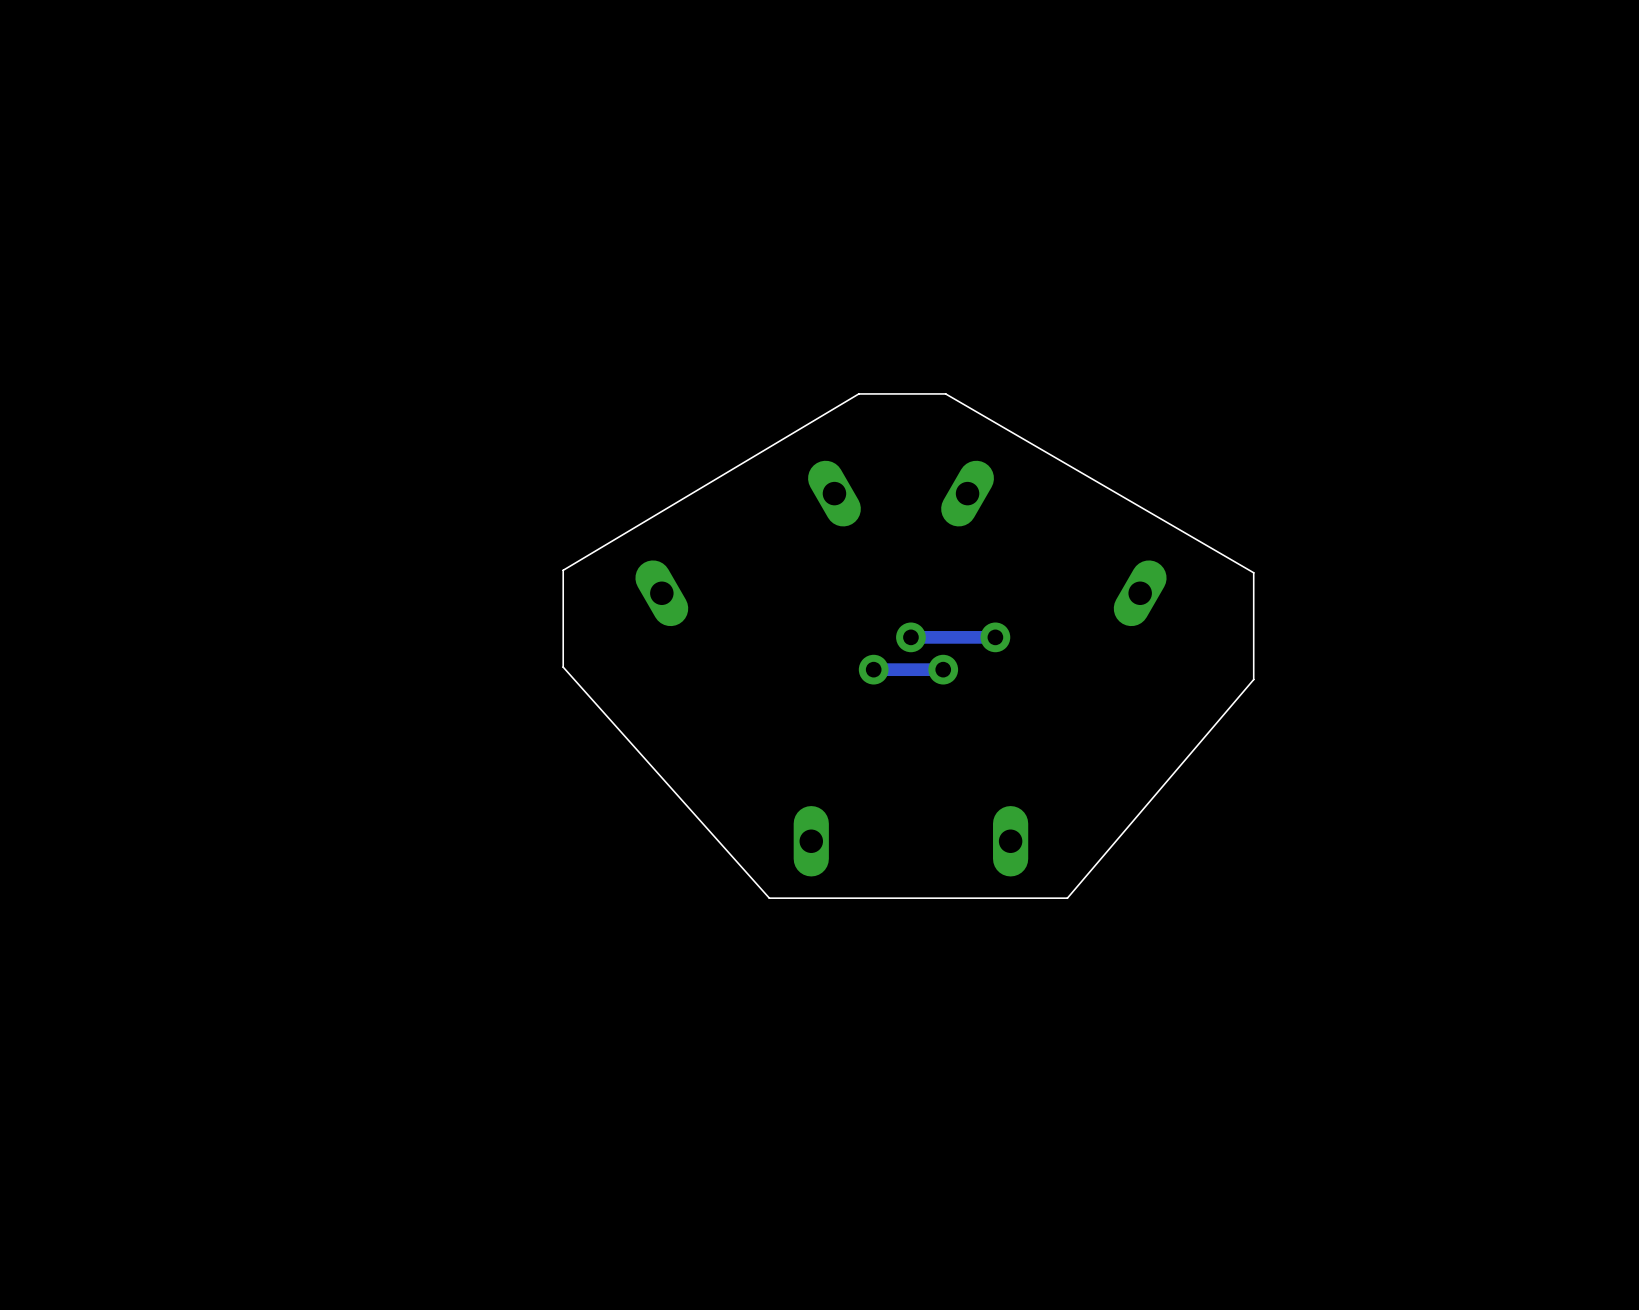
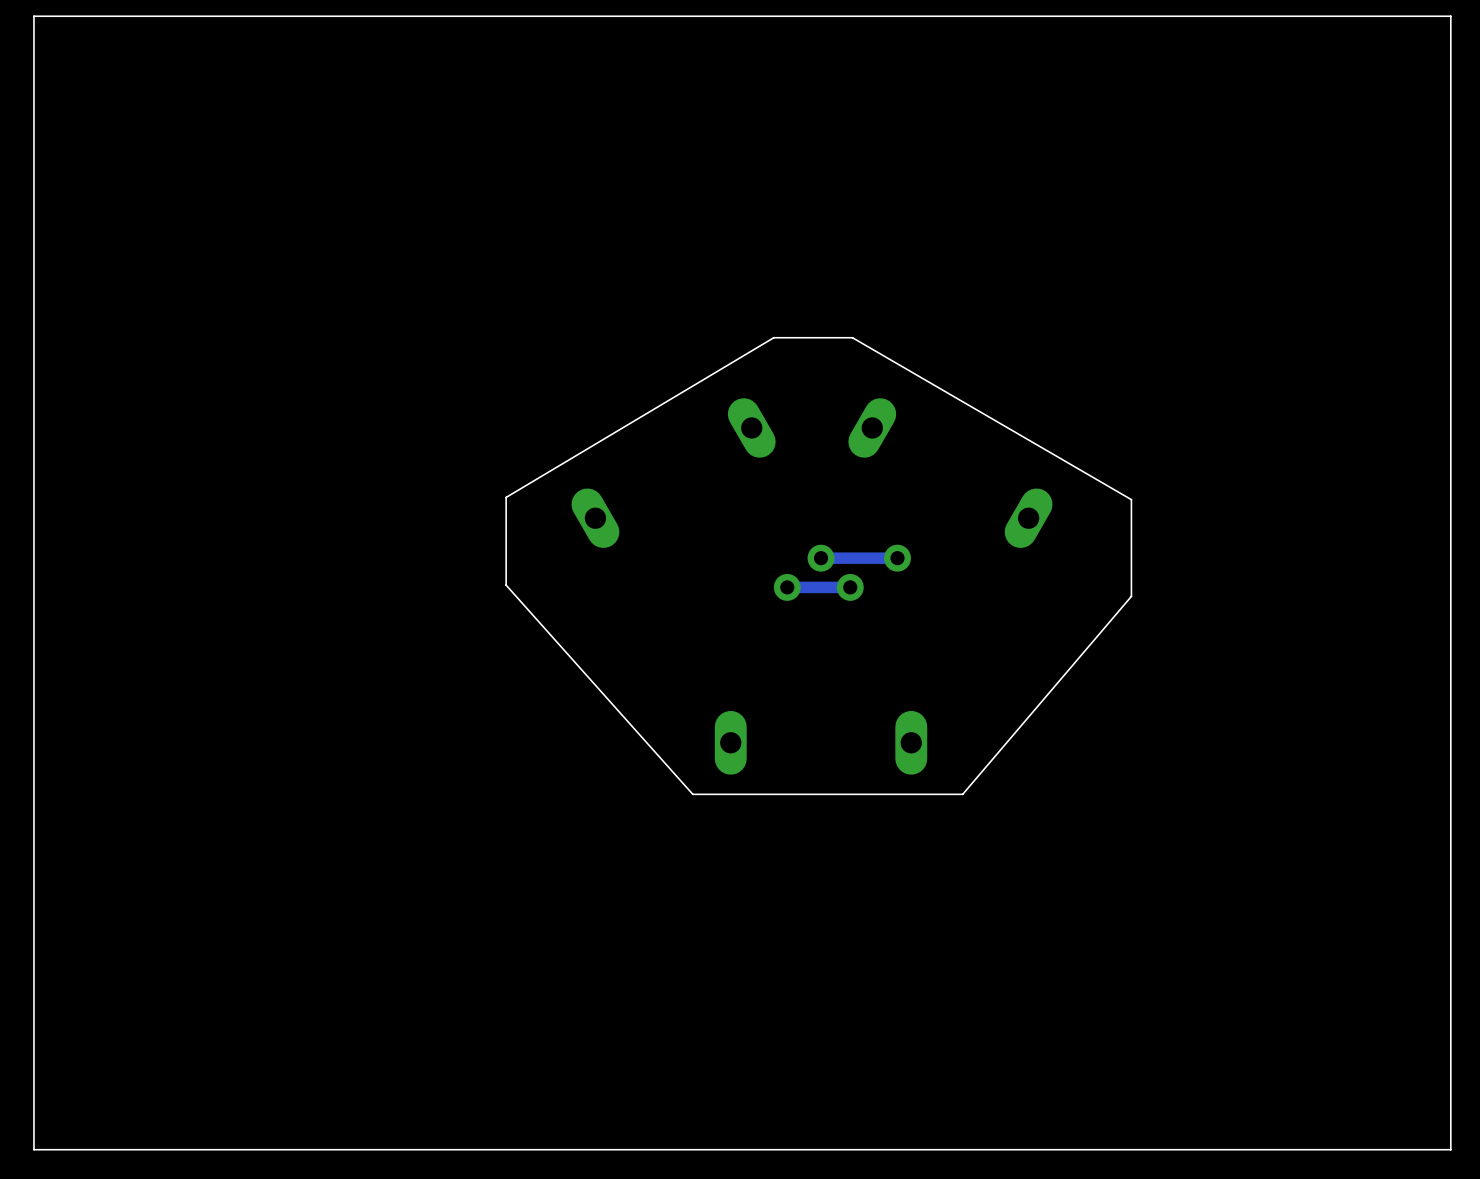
board edge: none -> (1450, 16) (33, 16) (33, 1149) (1450, 1149) (1450, 16)

